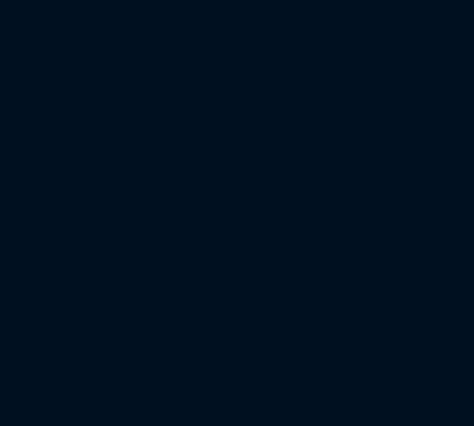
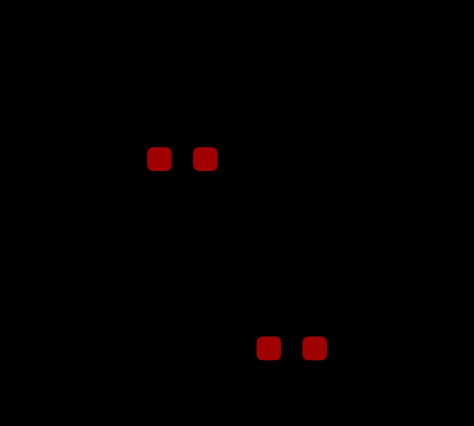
part: none -> (182, 159)
part: none -> (291, 348)

